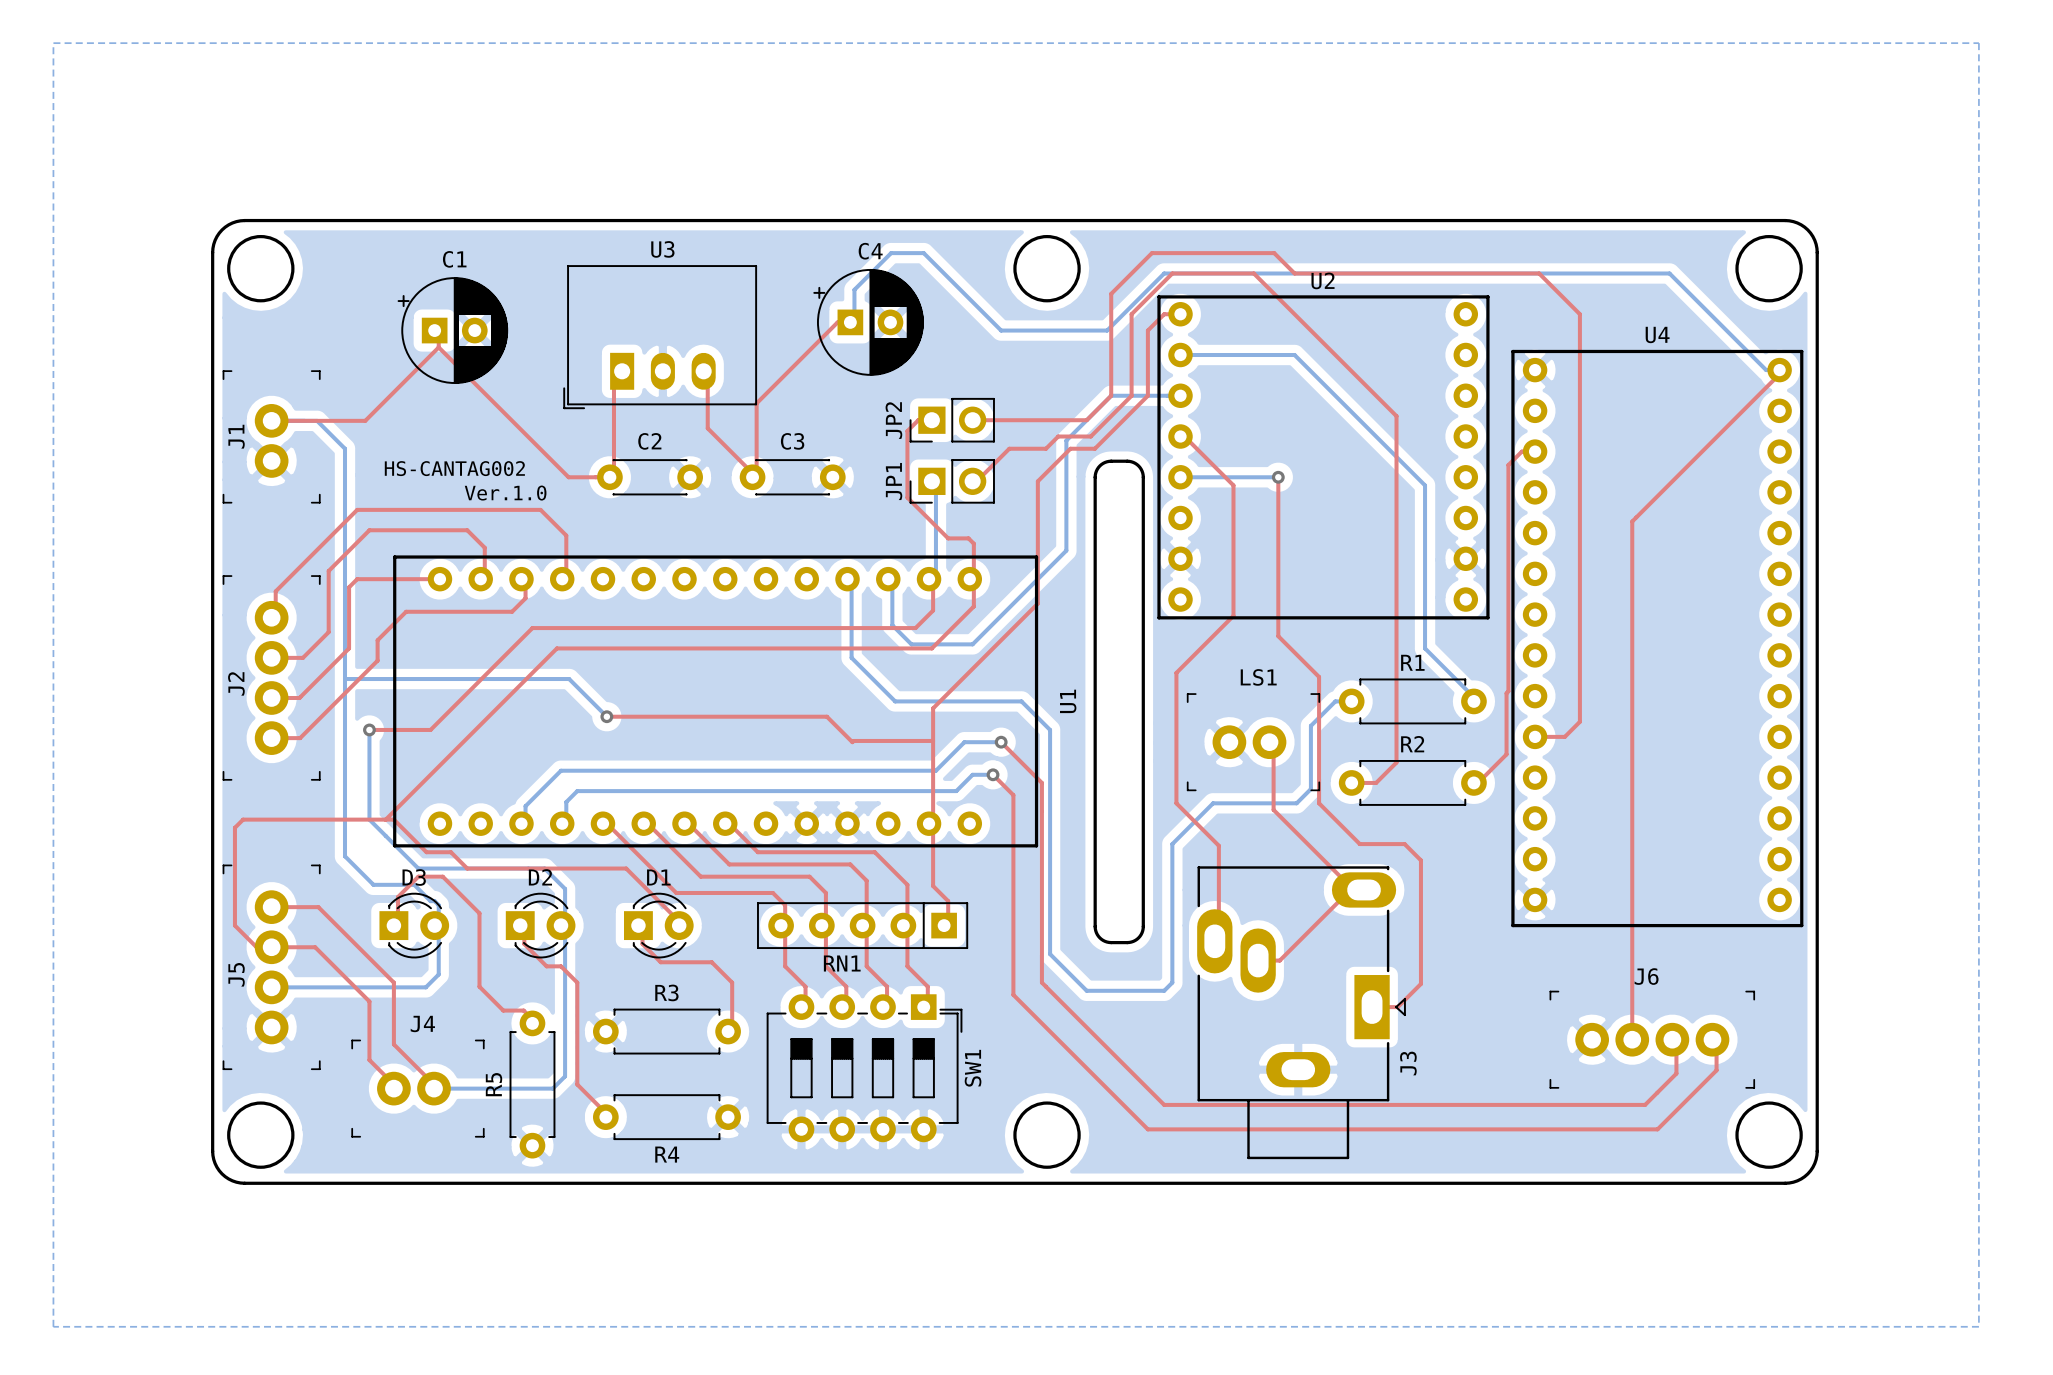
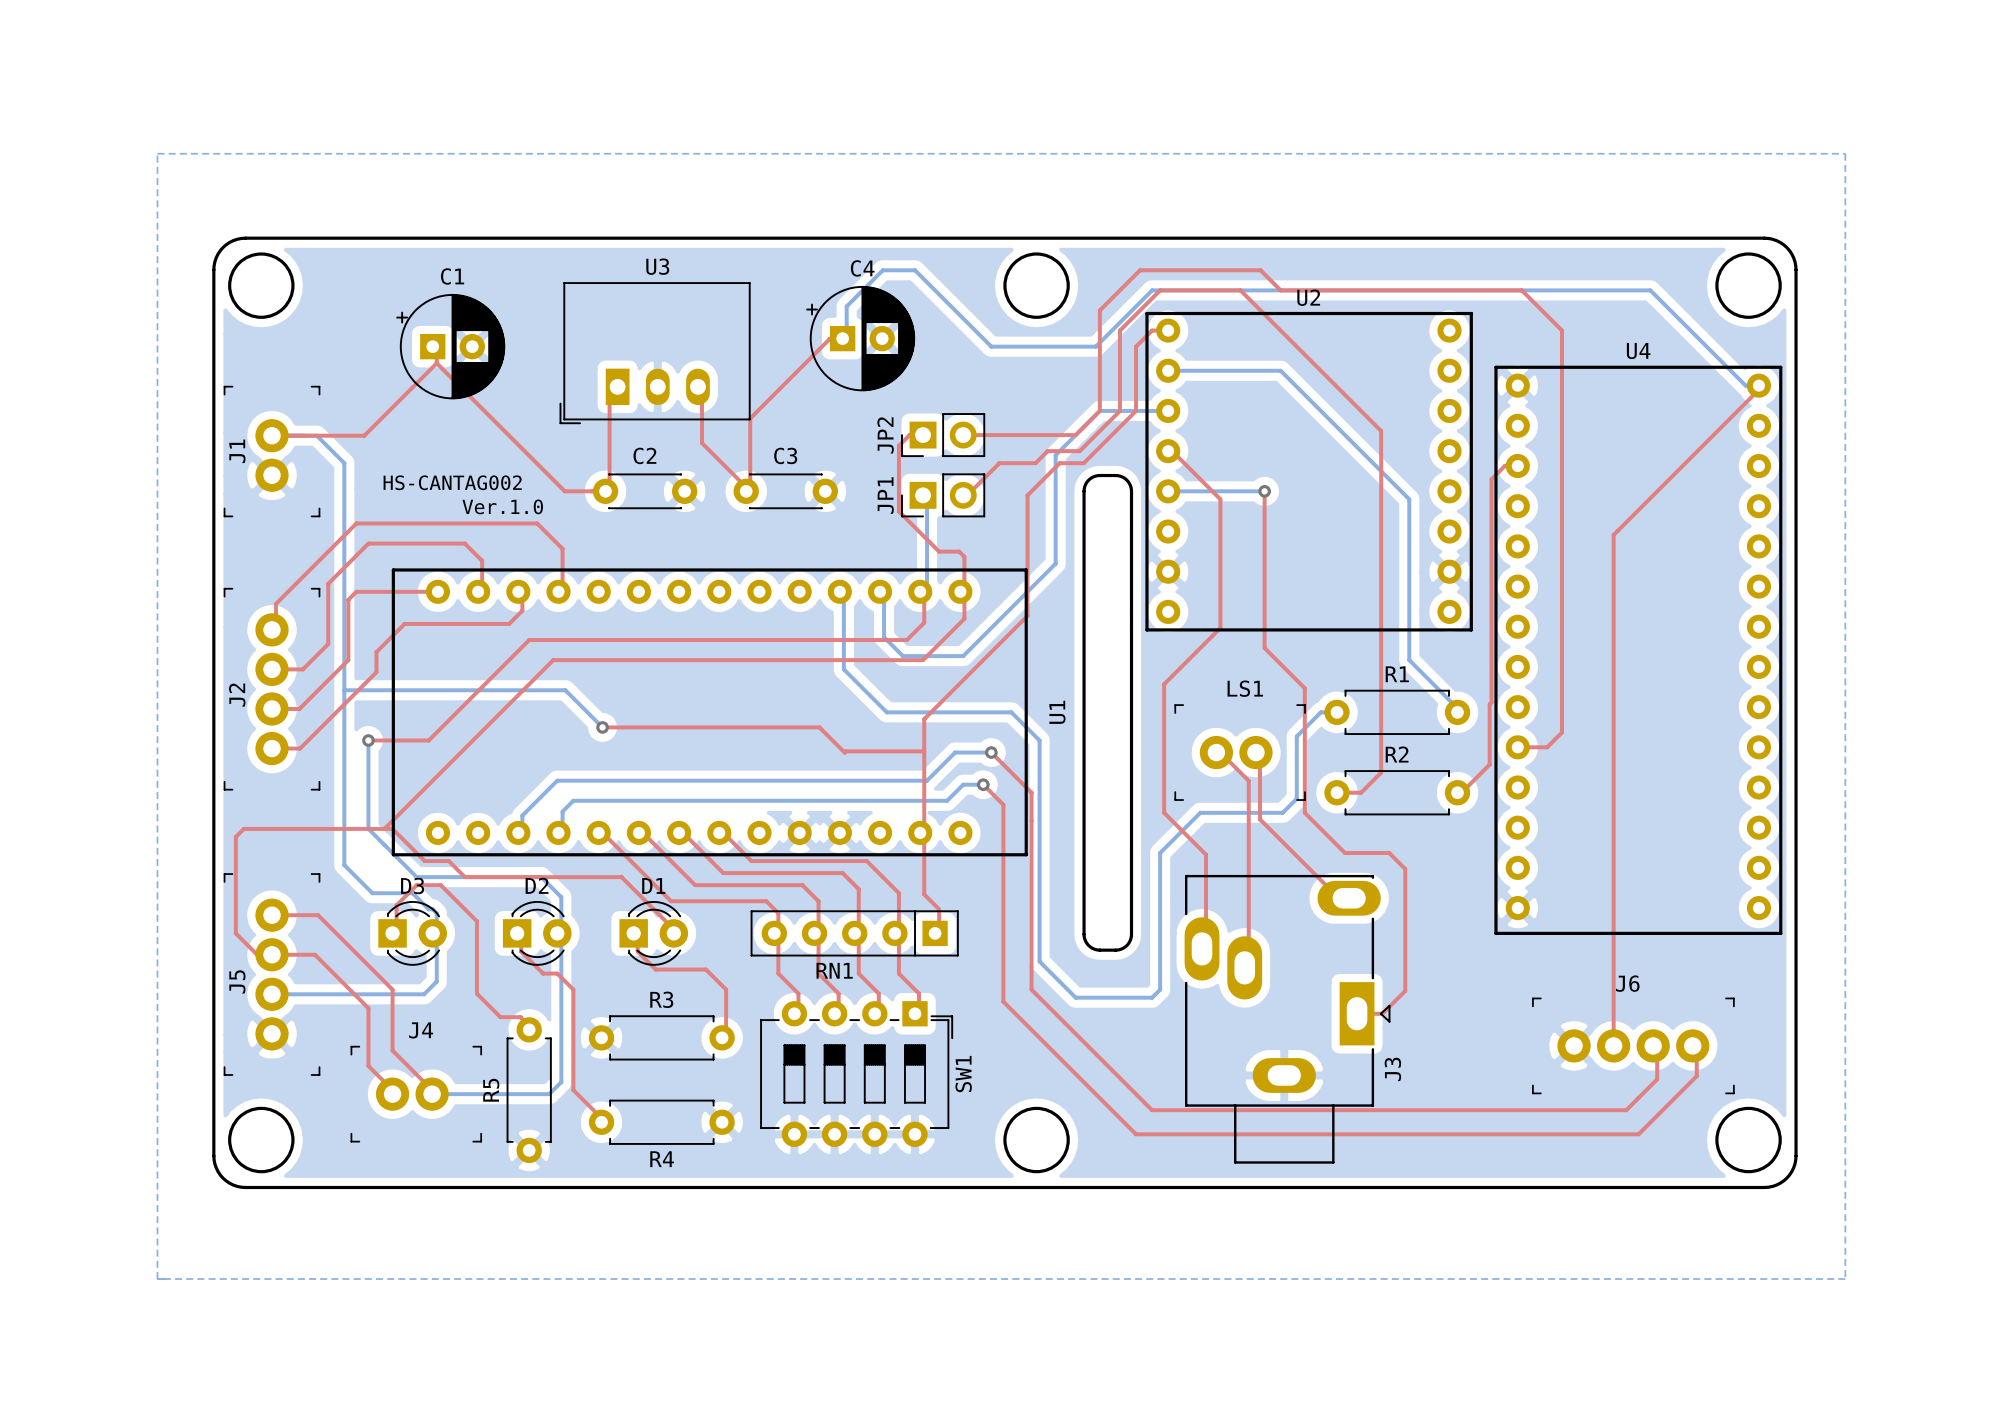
bottom zone outline: (53, 43) (1978, 43) (1978, 1326) (53, 1326) (53, 43) -> (157, 153) (157, 1279) (1845, 1279) (1845, 153) (157, 153)
top track: none -> (1220, 752) (1248, 780) (1248, 967)
top track: (1353, 889) (1349, 889) (1279, 960) (1258, 960) -> none

